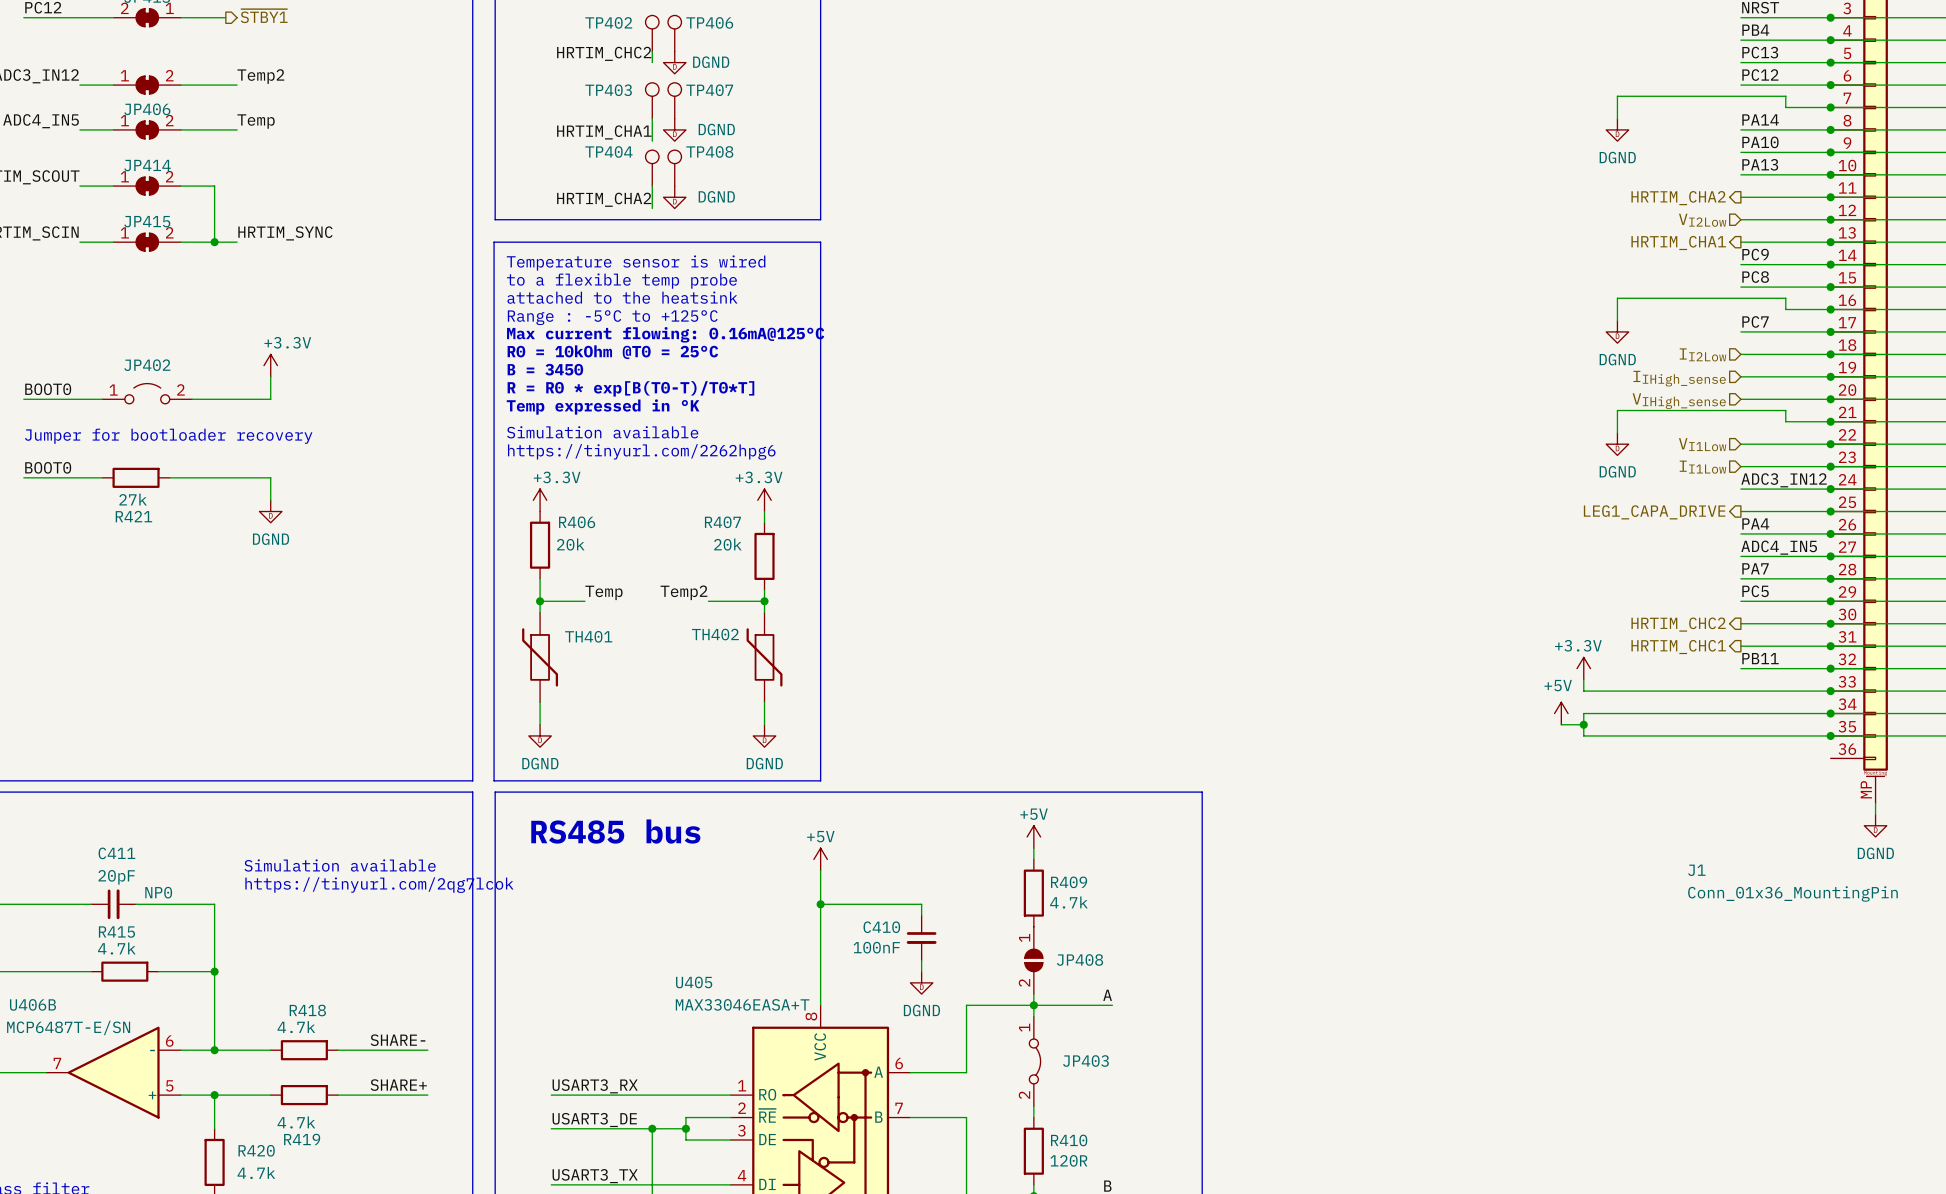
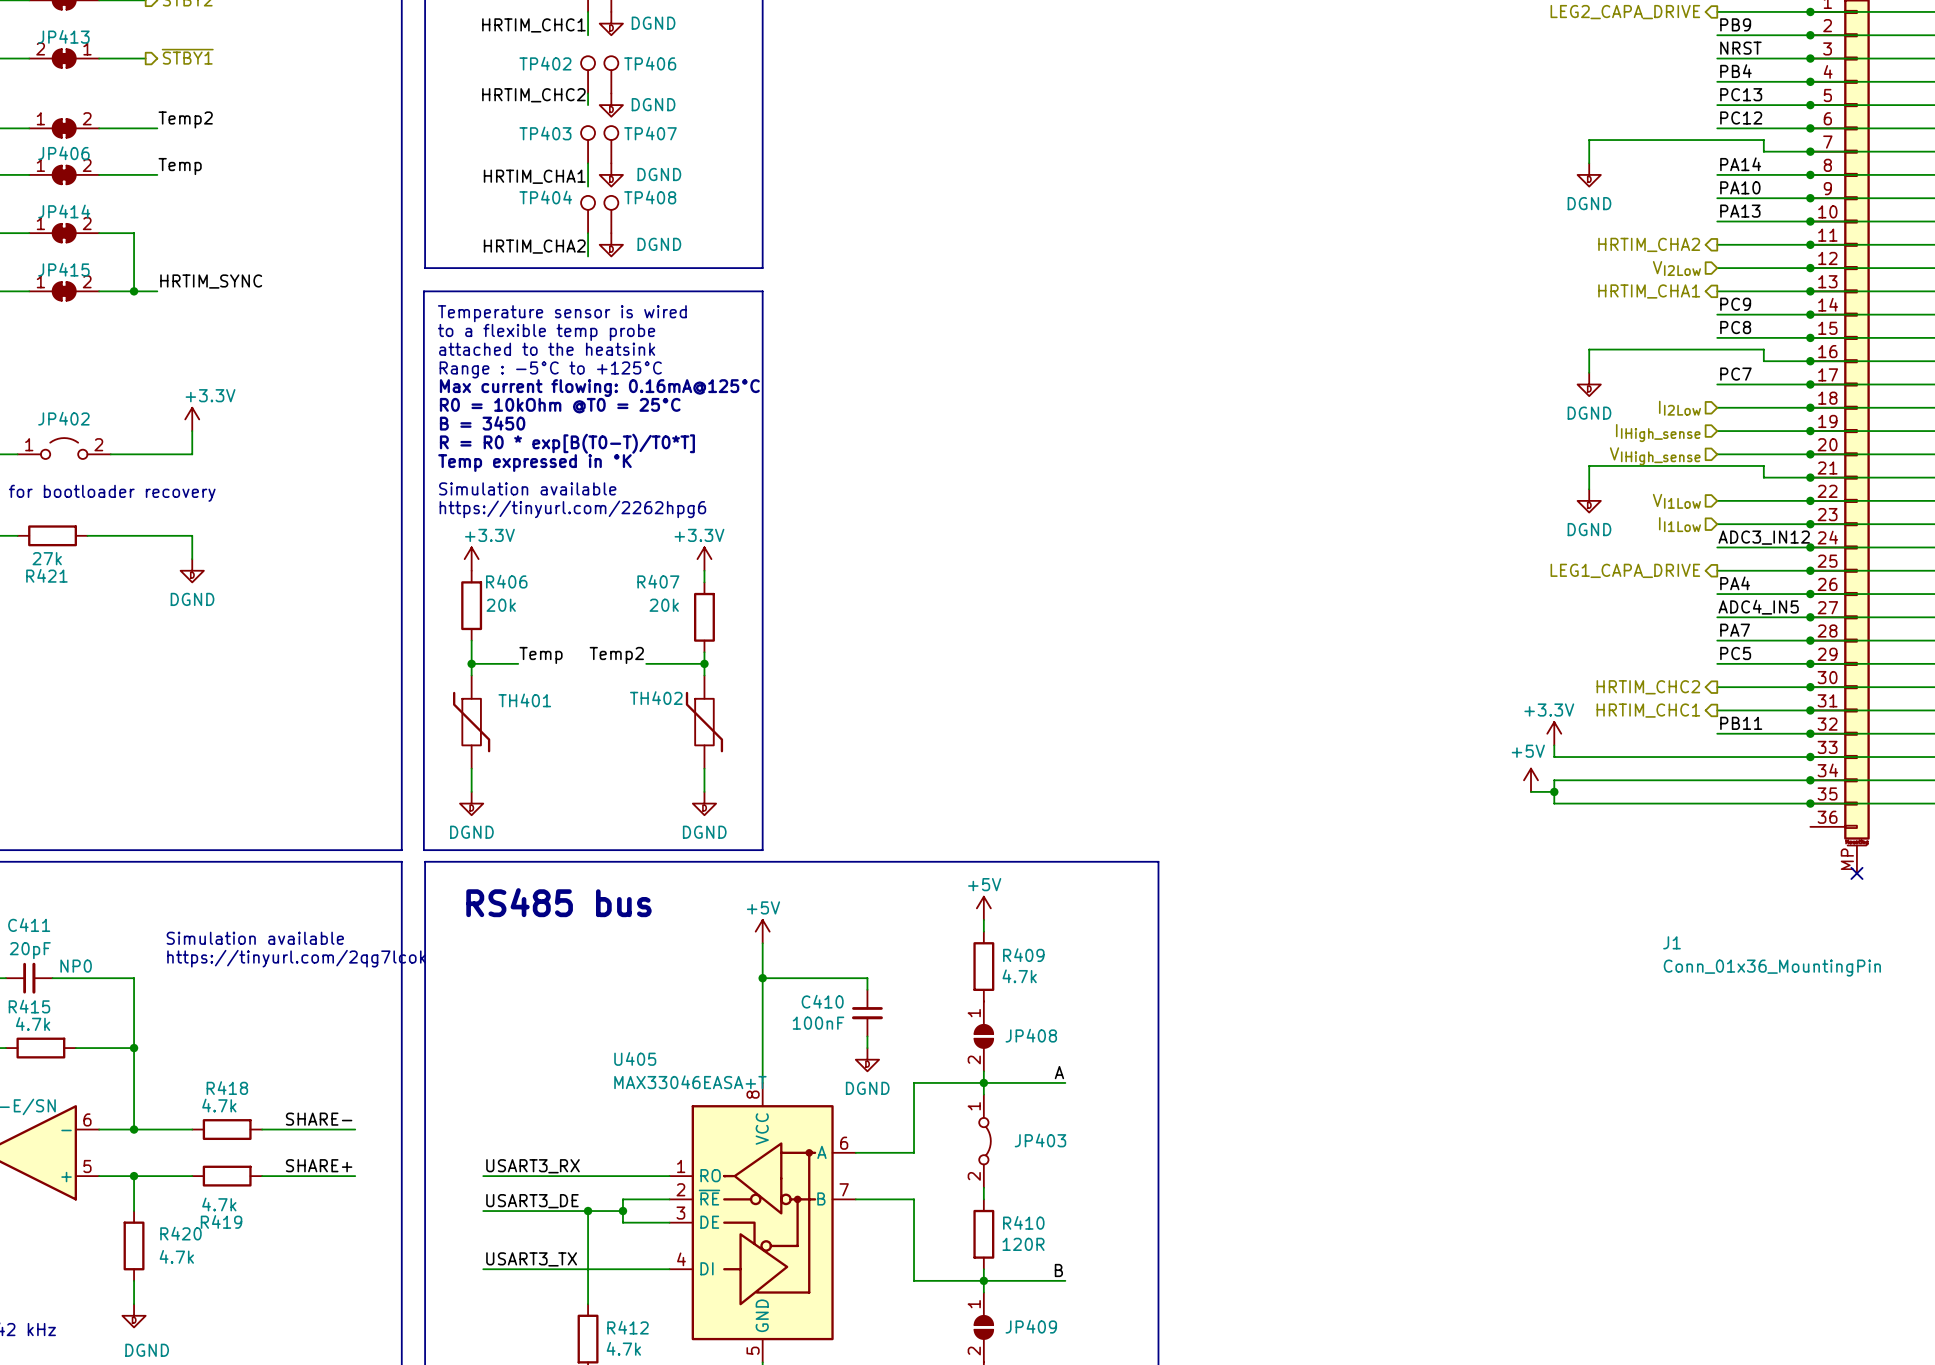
wire: (1875, 803) (1875, 814) -> none
no-connect mark: none -> (1856, 873)
power symbol: DGND (1875, 825) -> none

